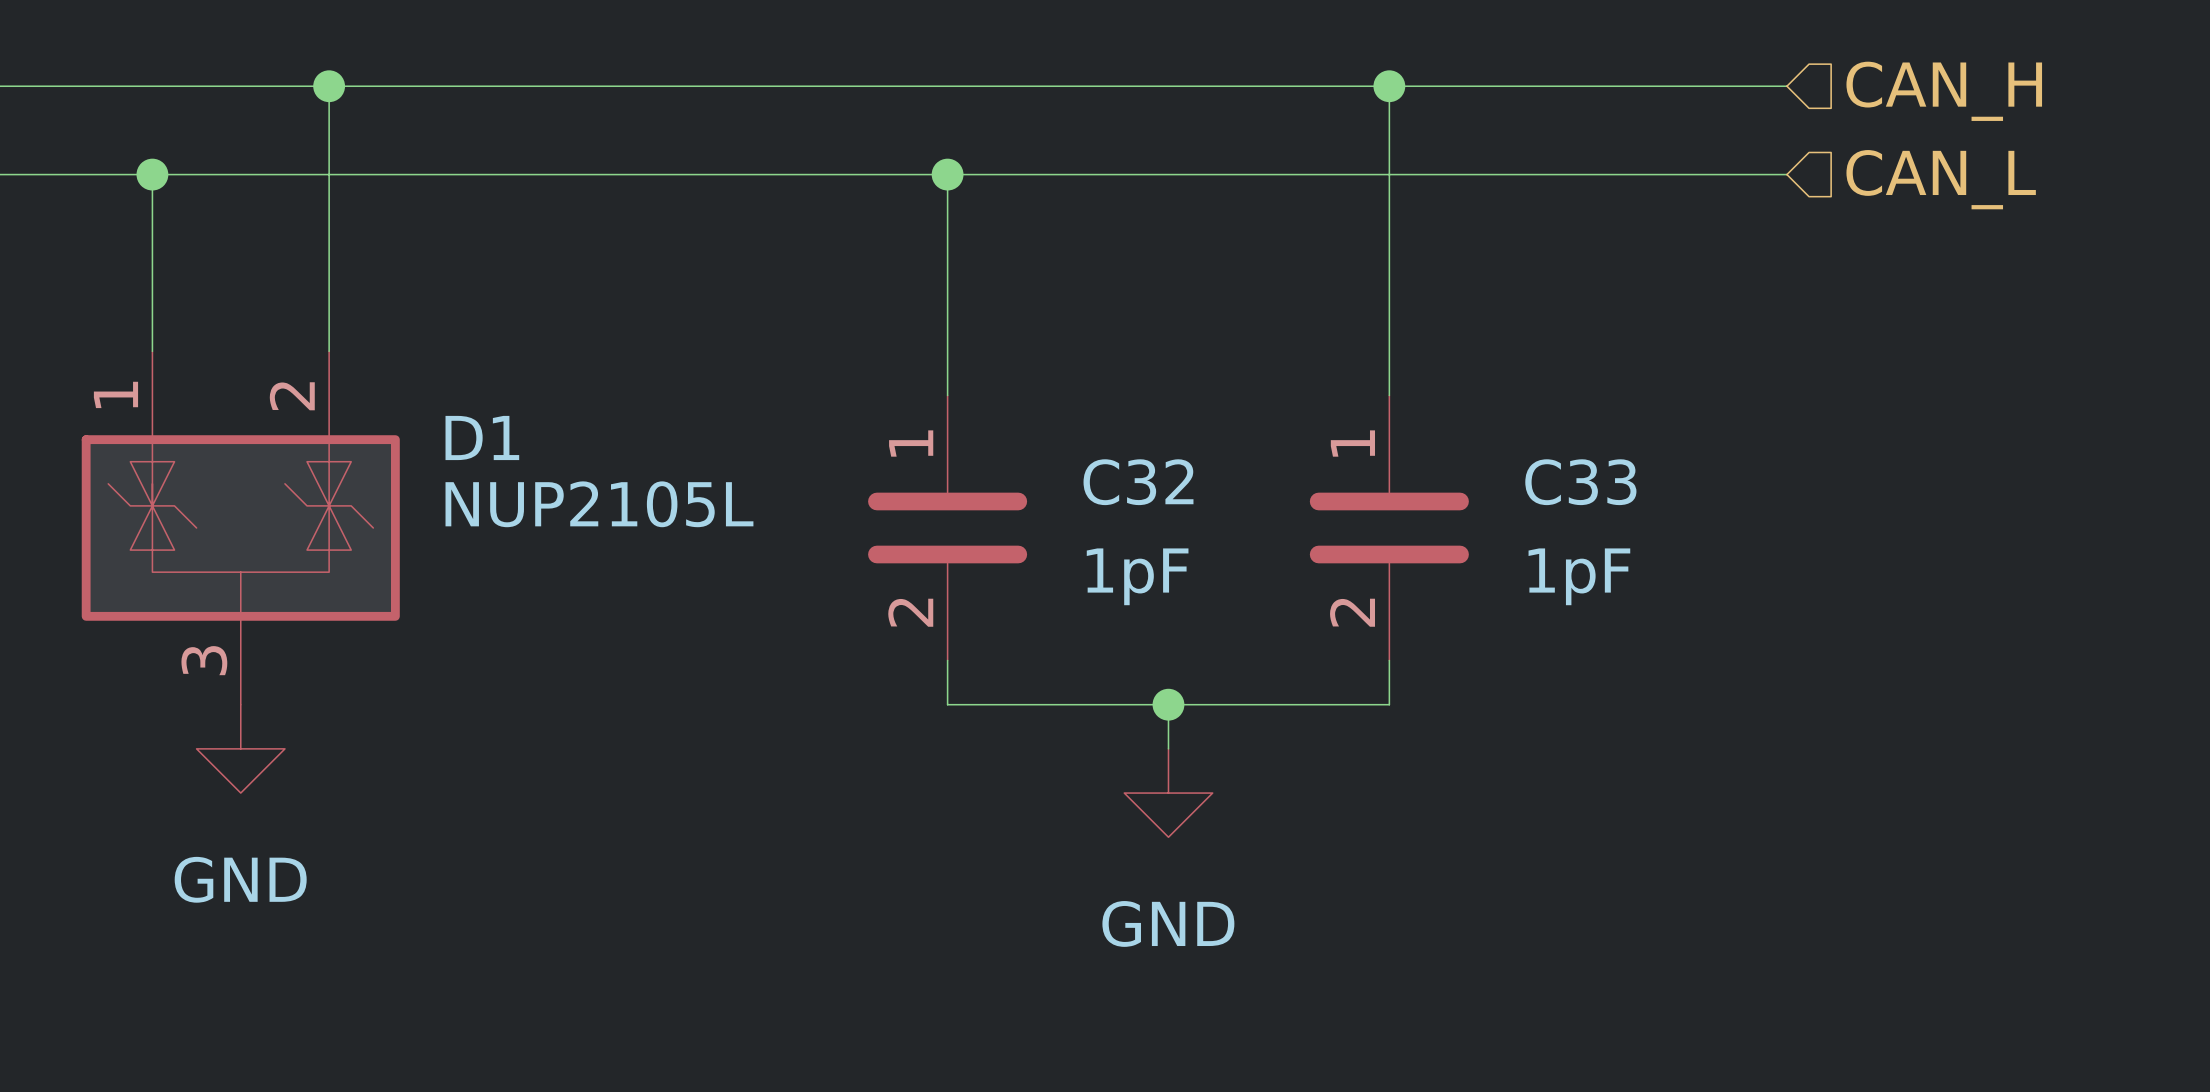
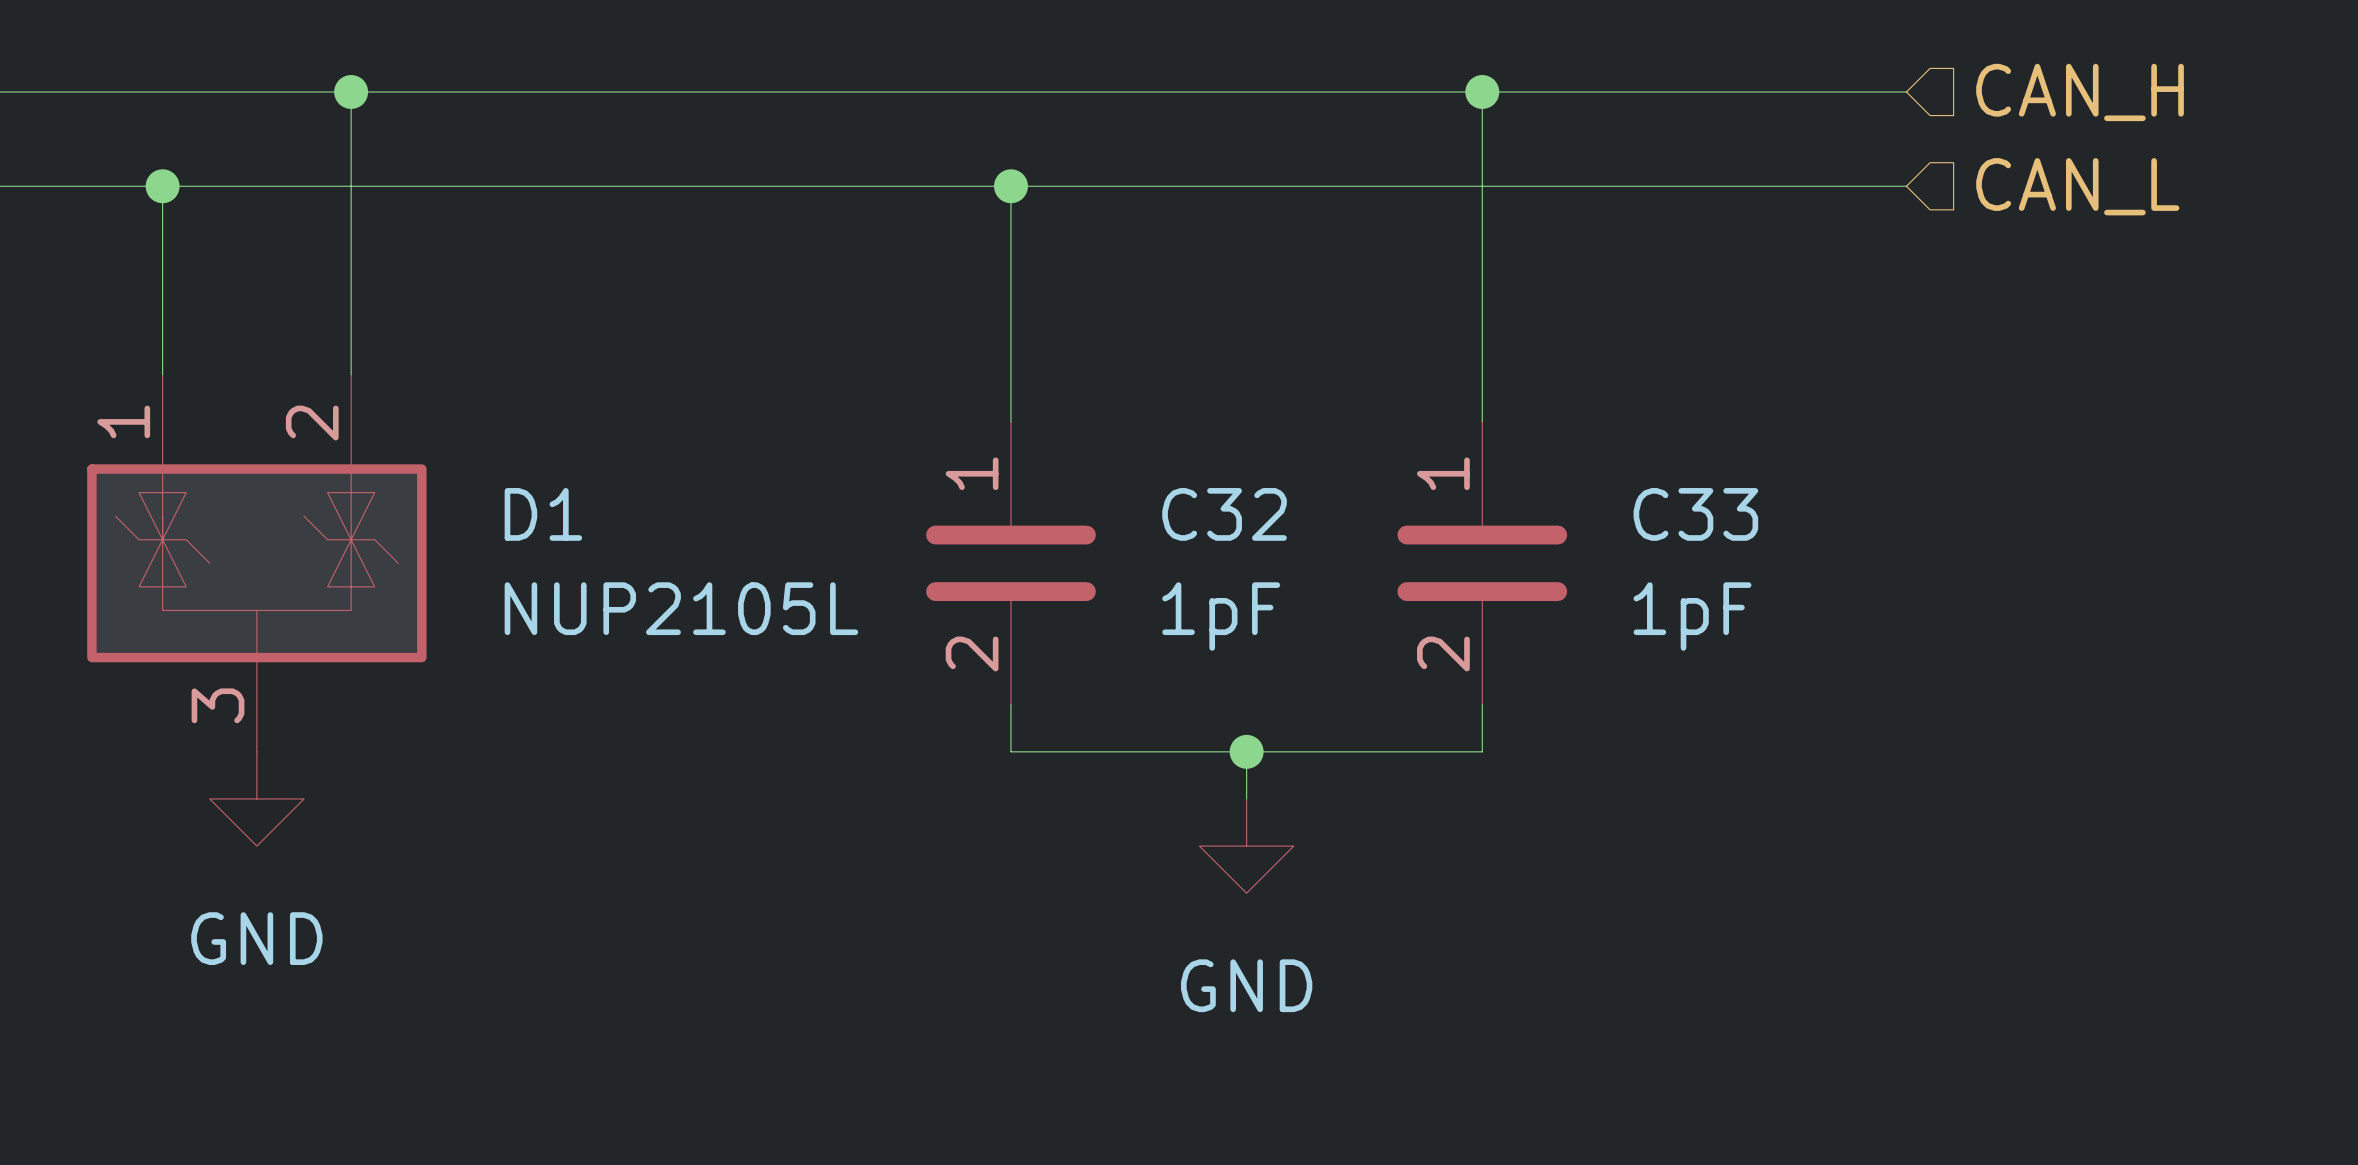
D1 name position: D1 (482, 437) -> D1 (543, 514)
D1 value position: NUP2105L (599, 504) -> NUP2105L (681, 608)

